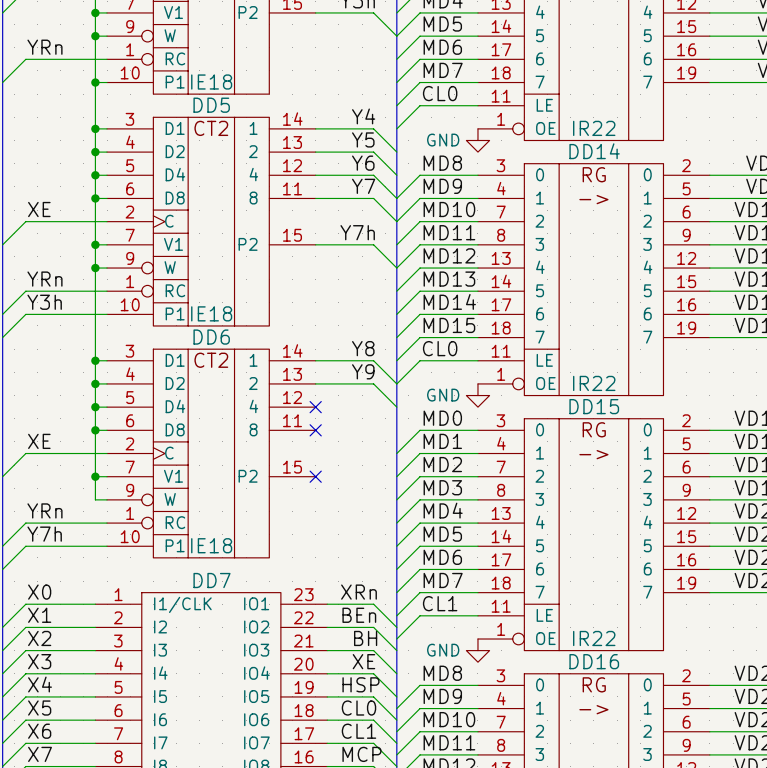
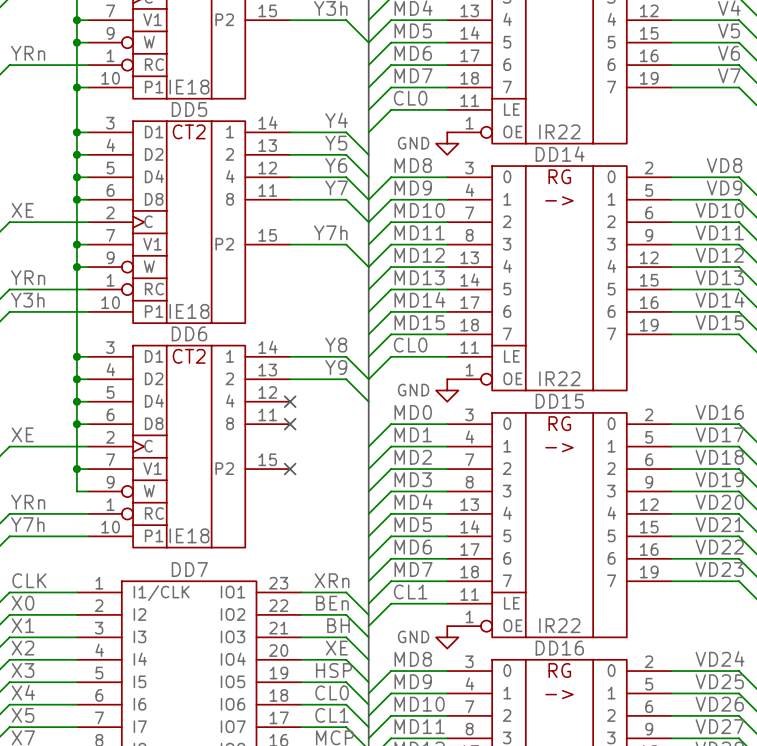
label: X0 (39, 592) -> CLK (29, 580)
label: X1 (39, 615) -> X0 (23, 603)
label: X2 (39, 638) -> X1 (23, 625)
label: X3 (39, 661) -> X2 (23, 648)
label: X4 (40, 684) -> X3 (23, 670)
label: X5 (39, 708) -> X4 (23, 692)
label: X6 (39, 731) -> X5 (23, 715)

